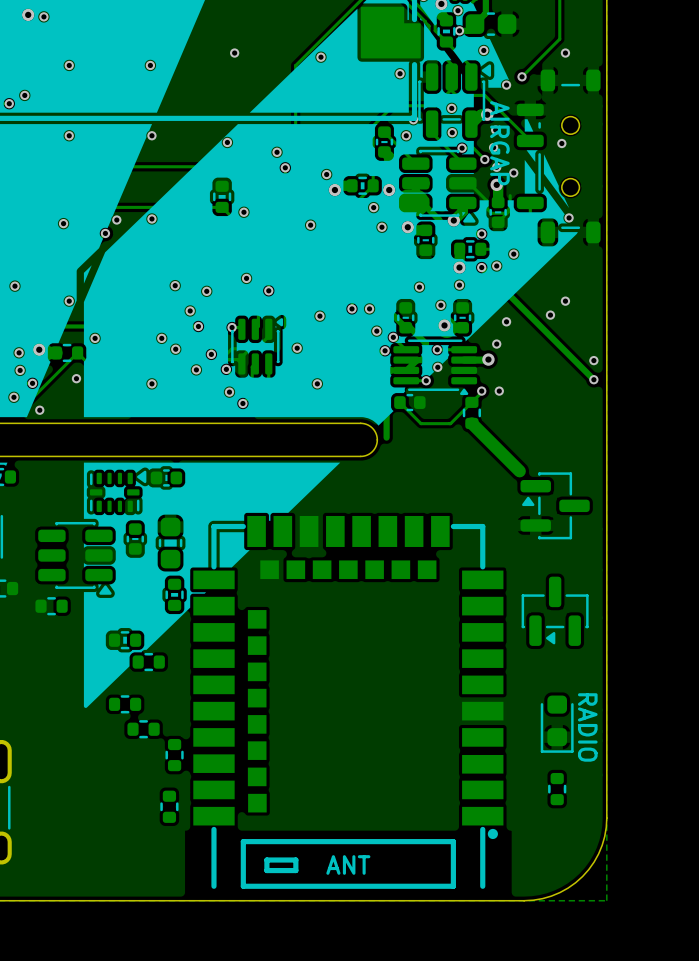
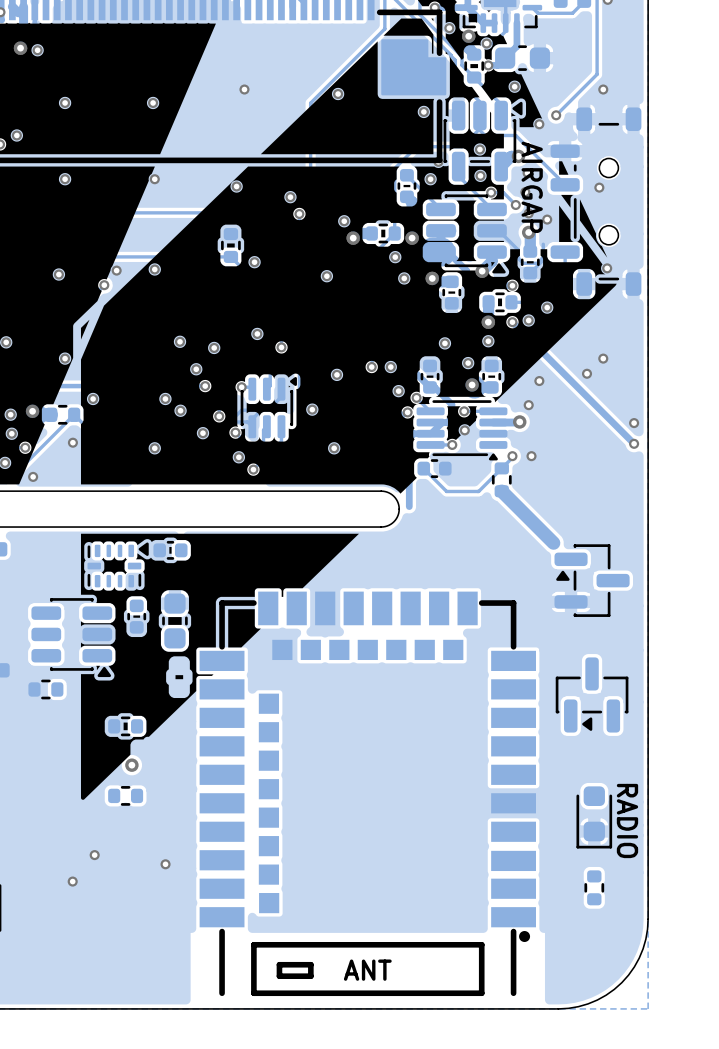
part: (174, 594) -> none
part: (148, 662) -> none
via: none -> (131, 765)
part: (143, 729) -> none
part: (174, 755) -> none
via: none -> (94, 855)
via: none -> (165, 864)
via: none -> (72, 881)
part: (169, 806) -> none

